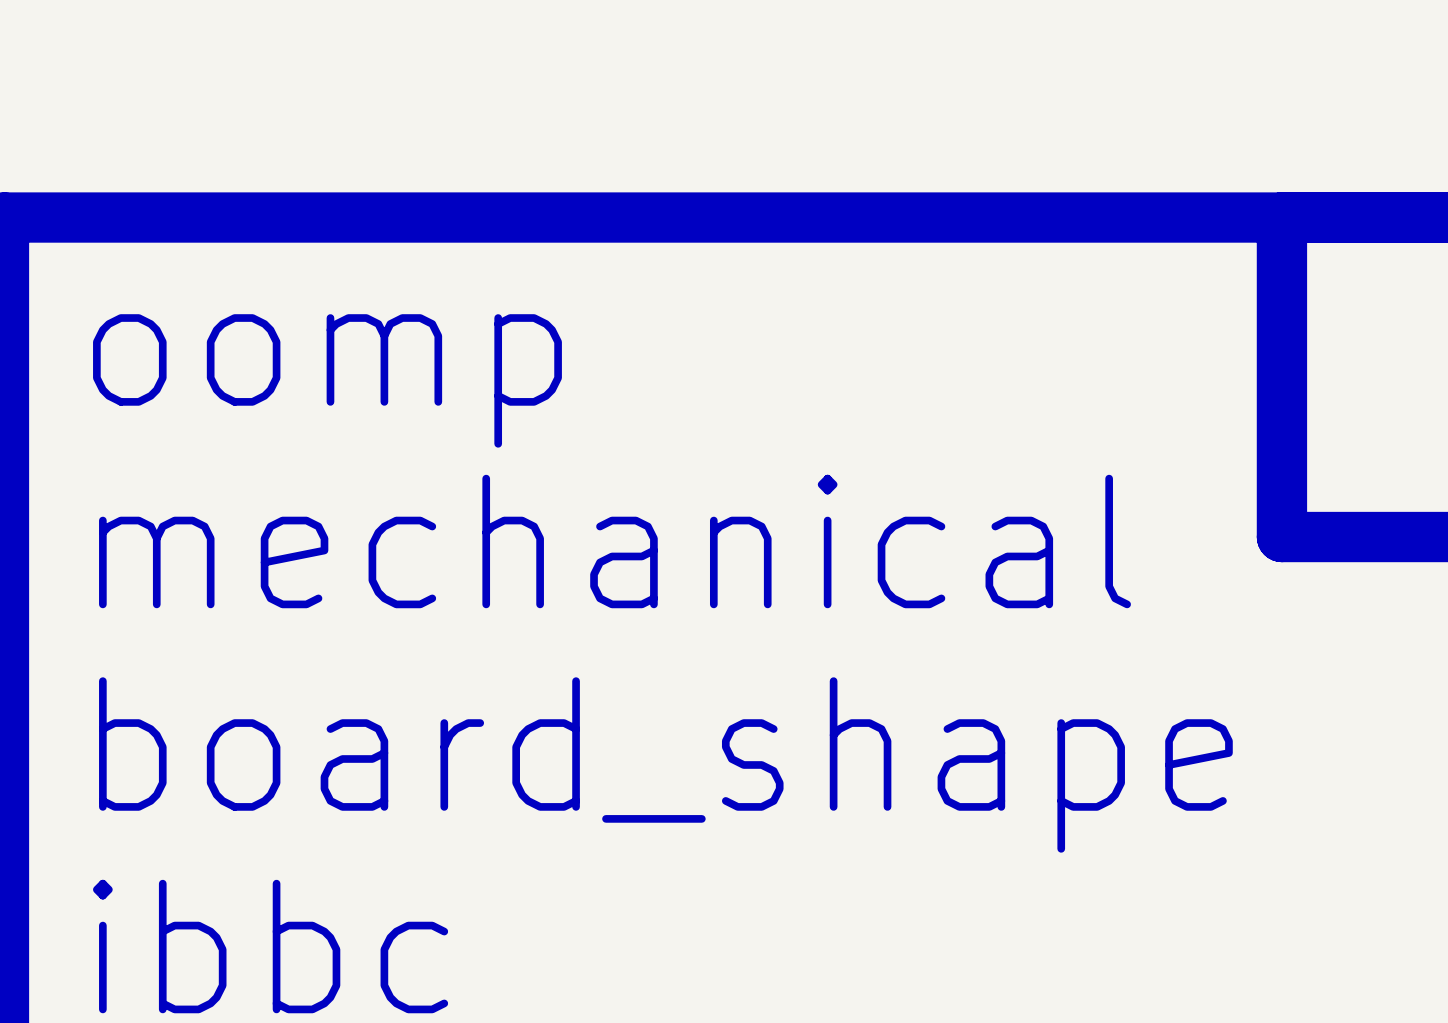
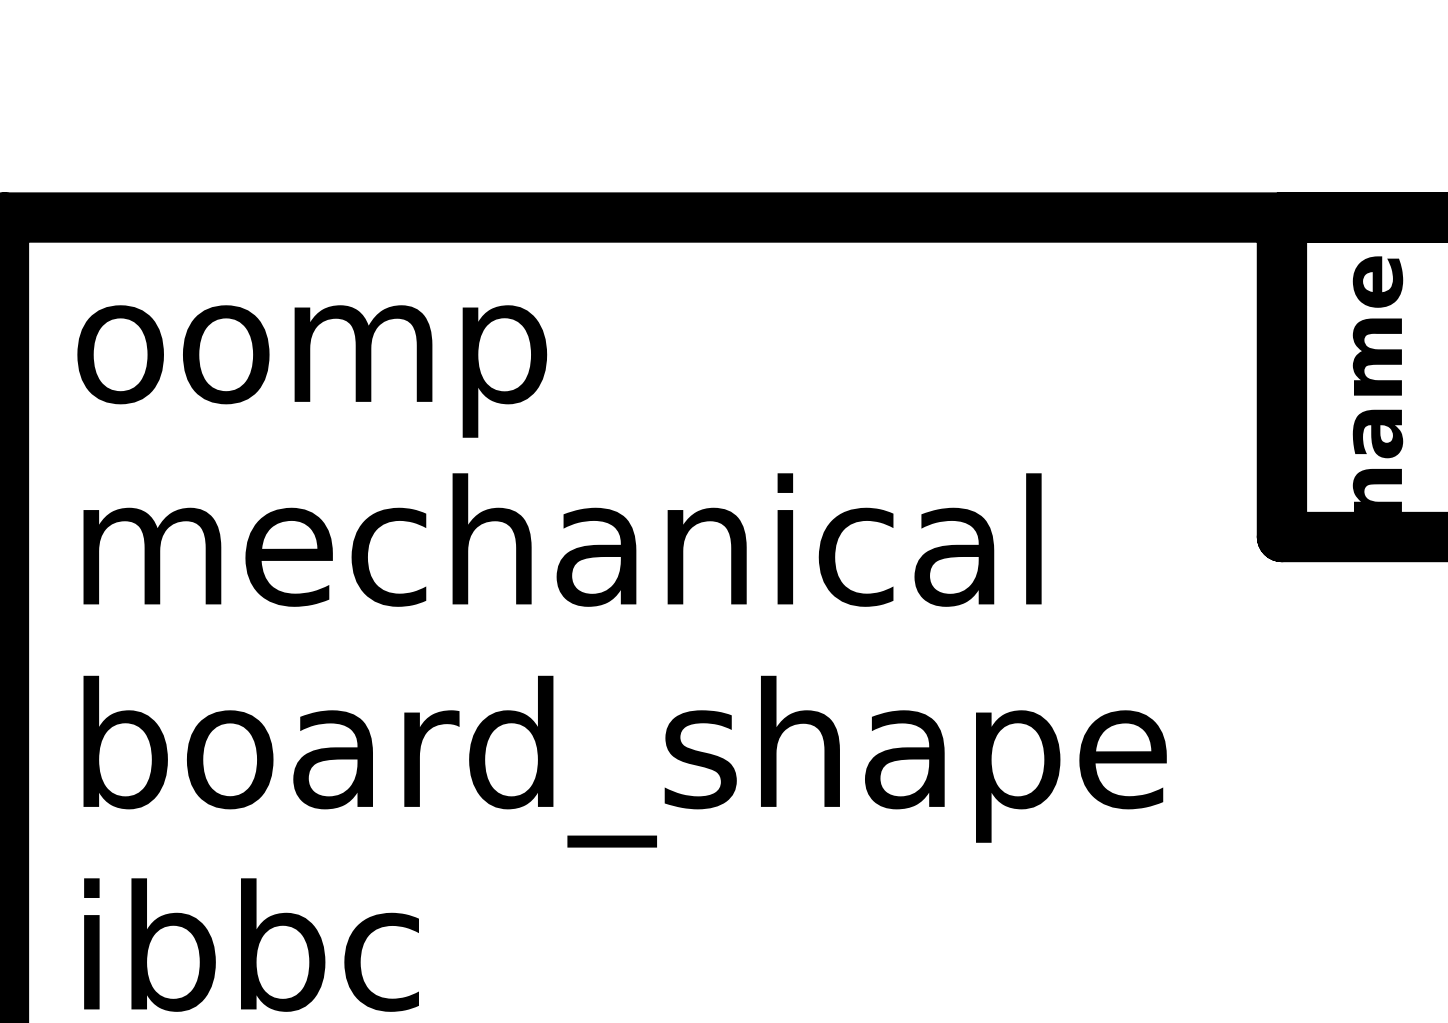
text: none -> name (1378, 386)

